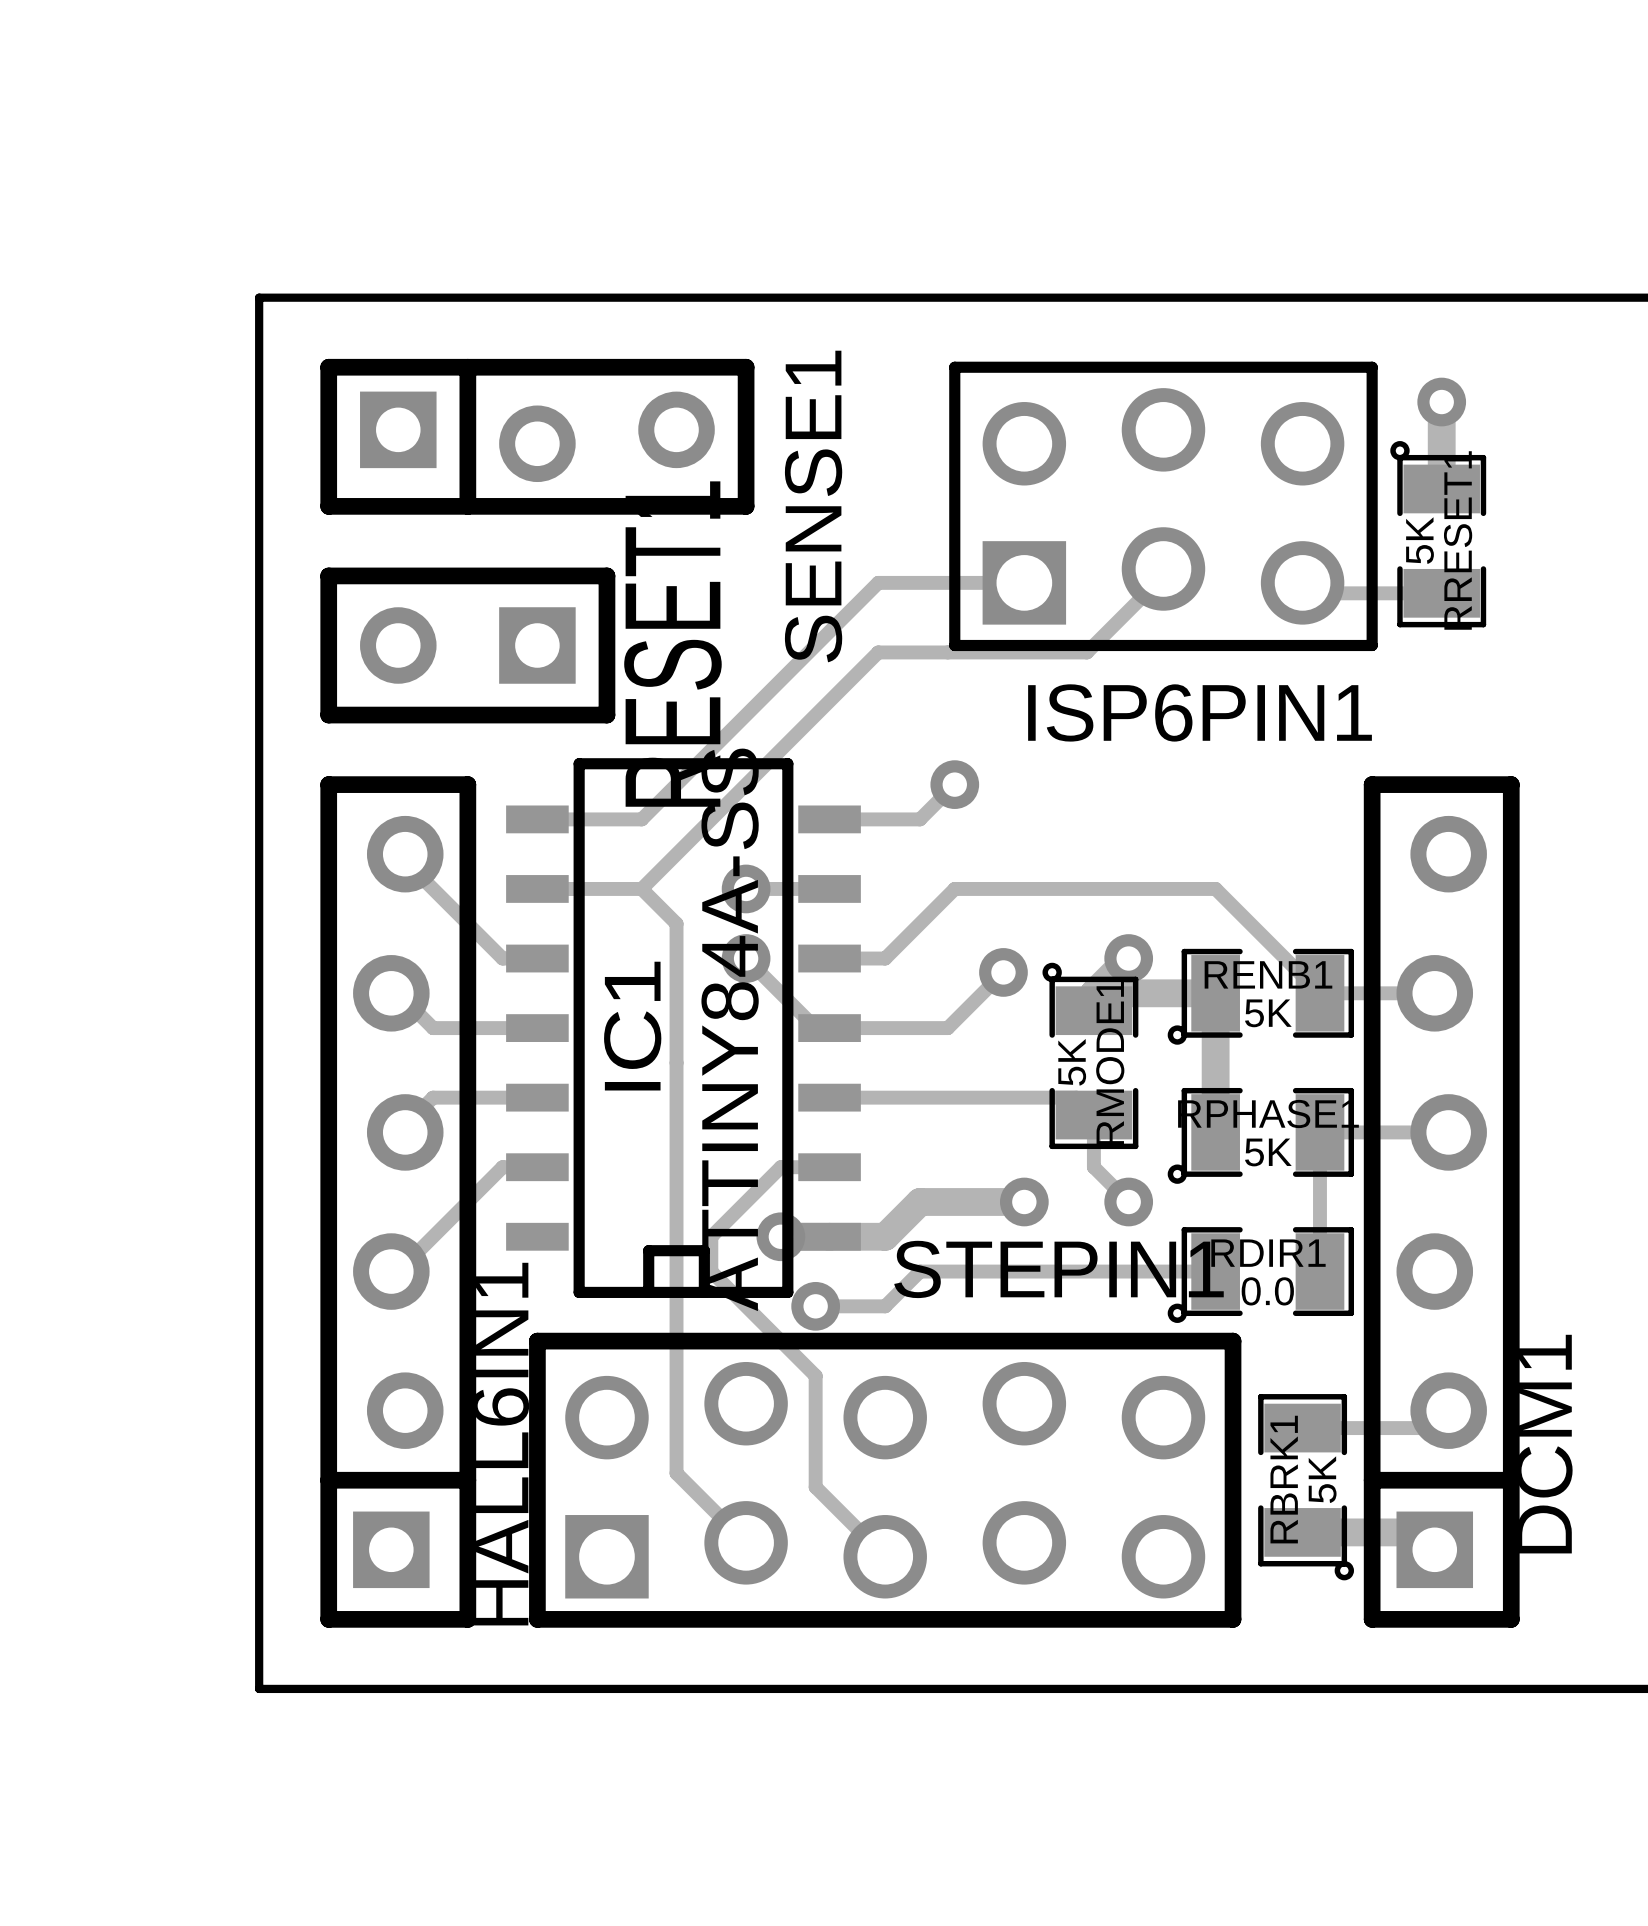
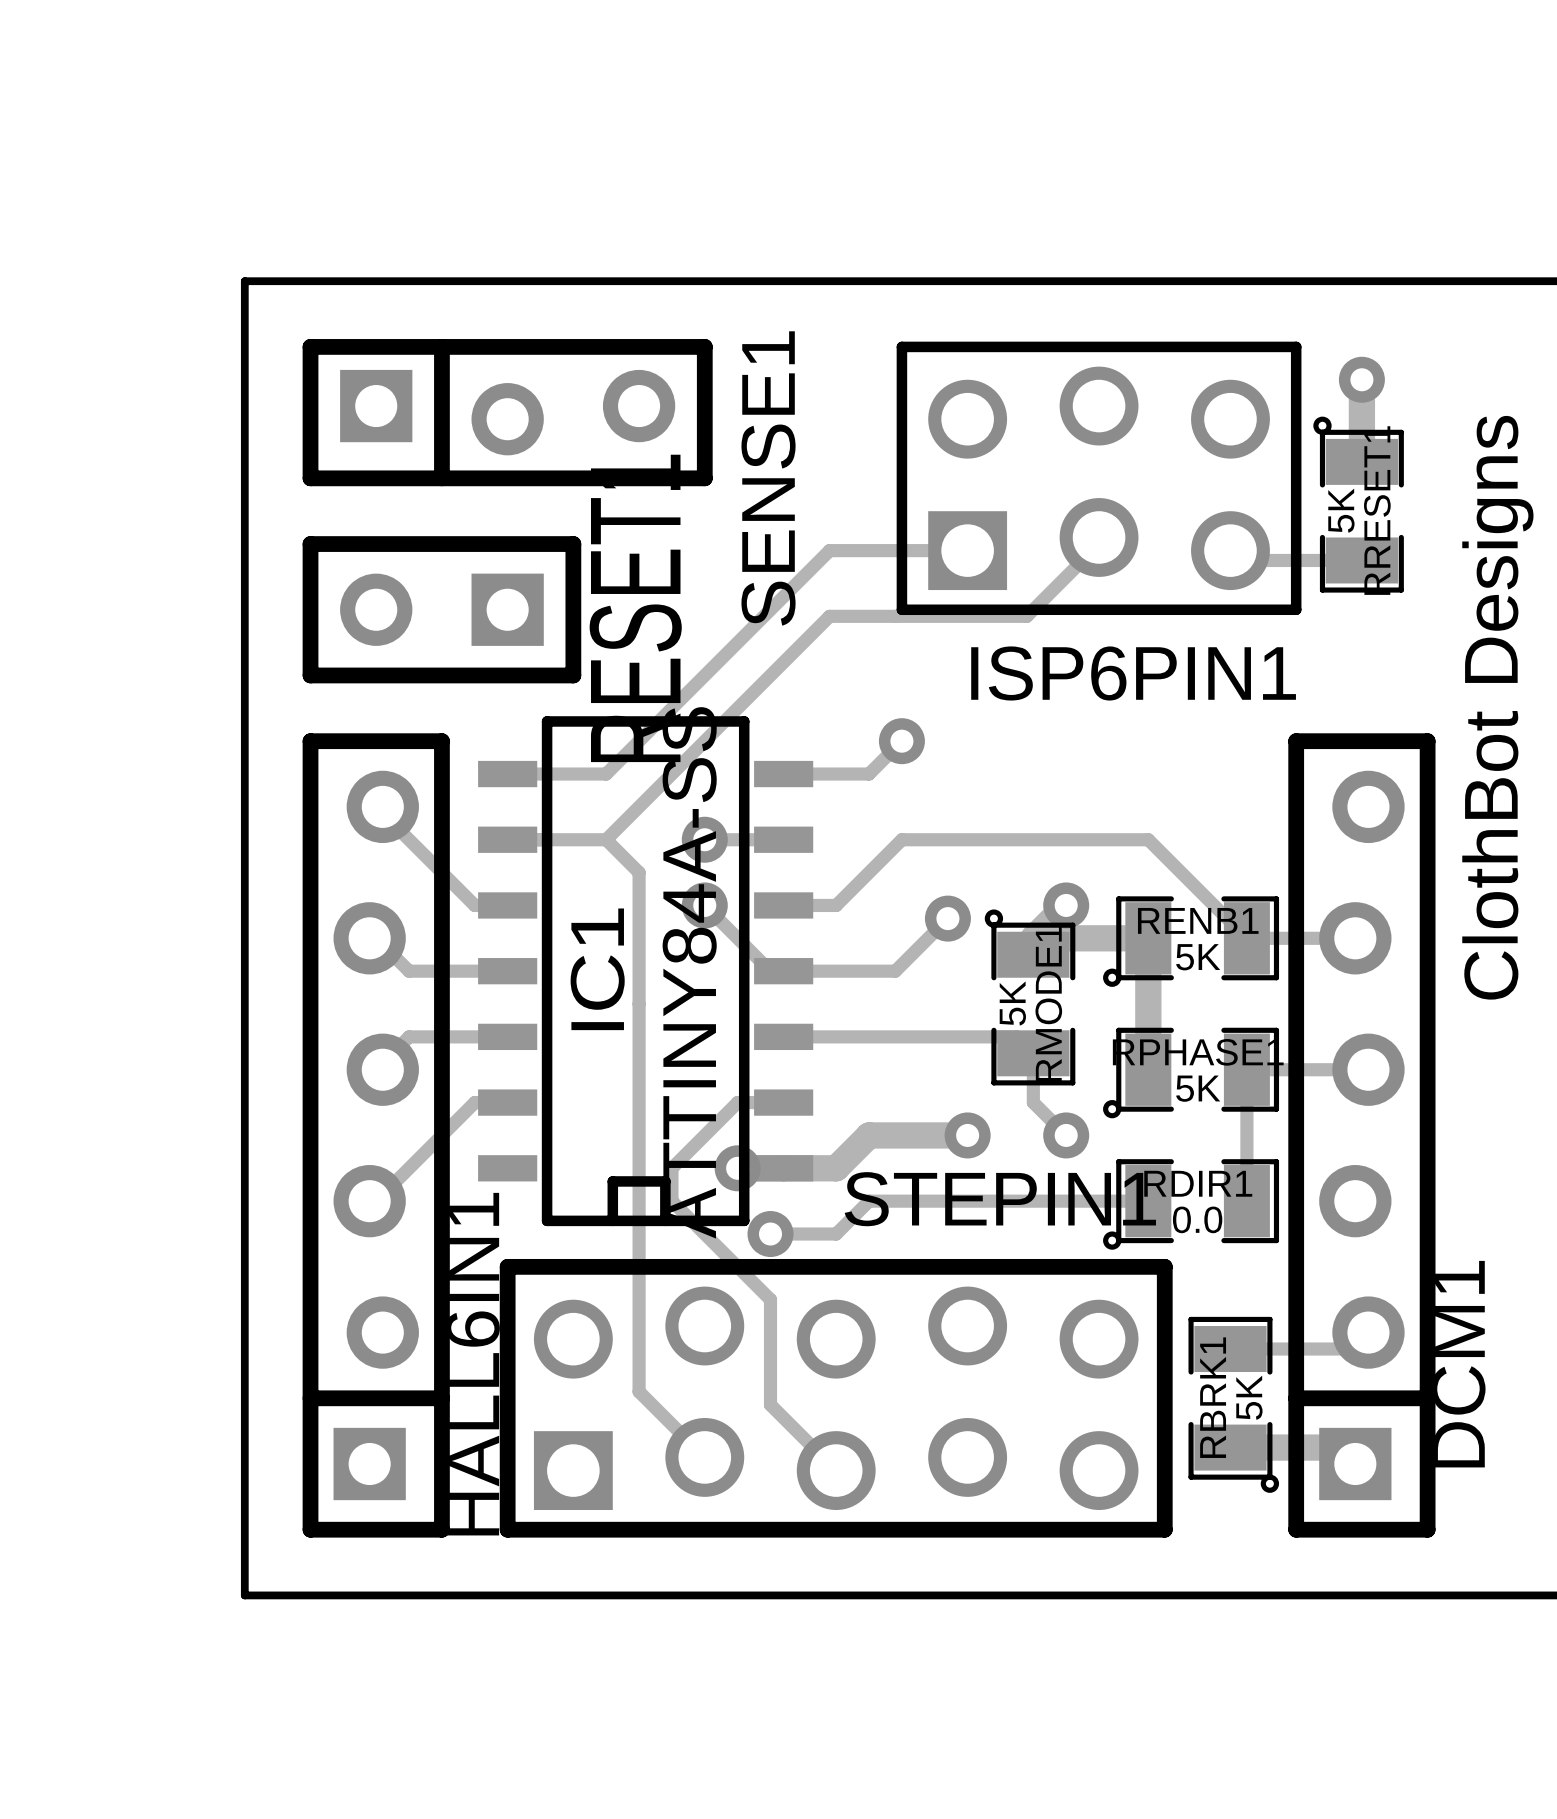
text: none -> ClothBot Designs (1497, 707)

